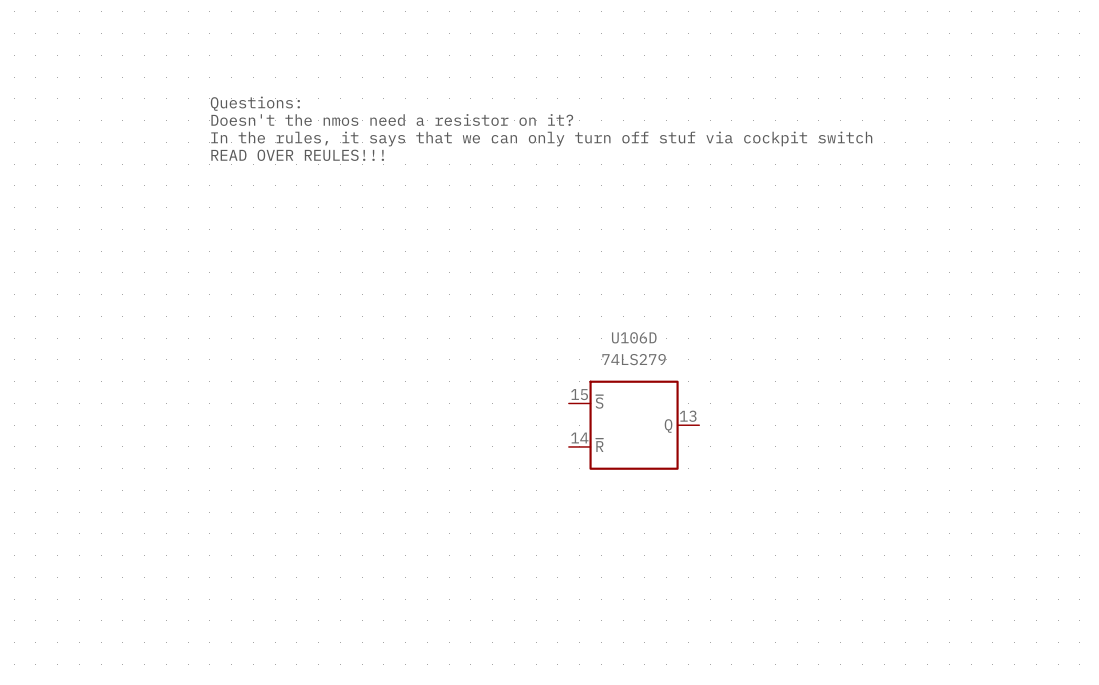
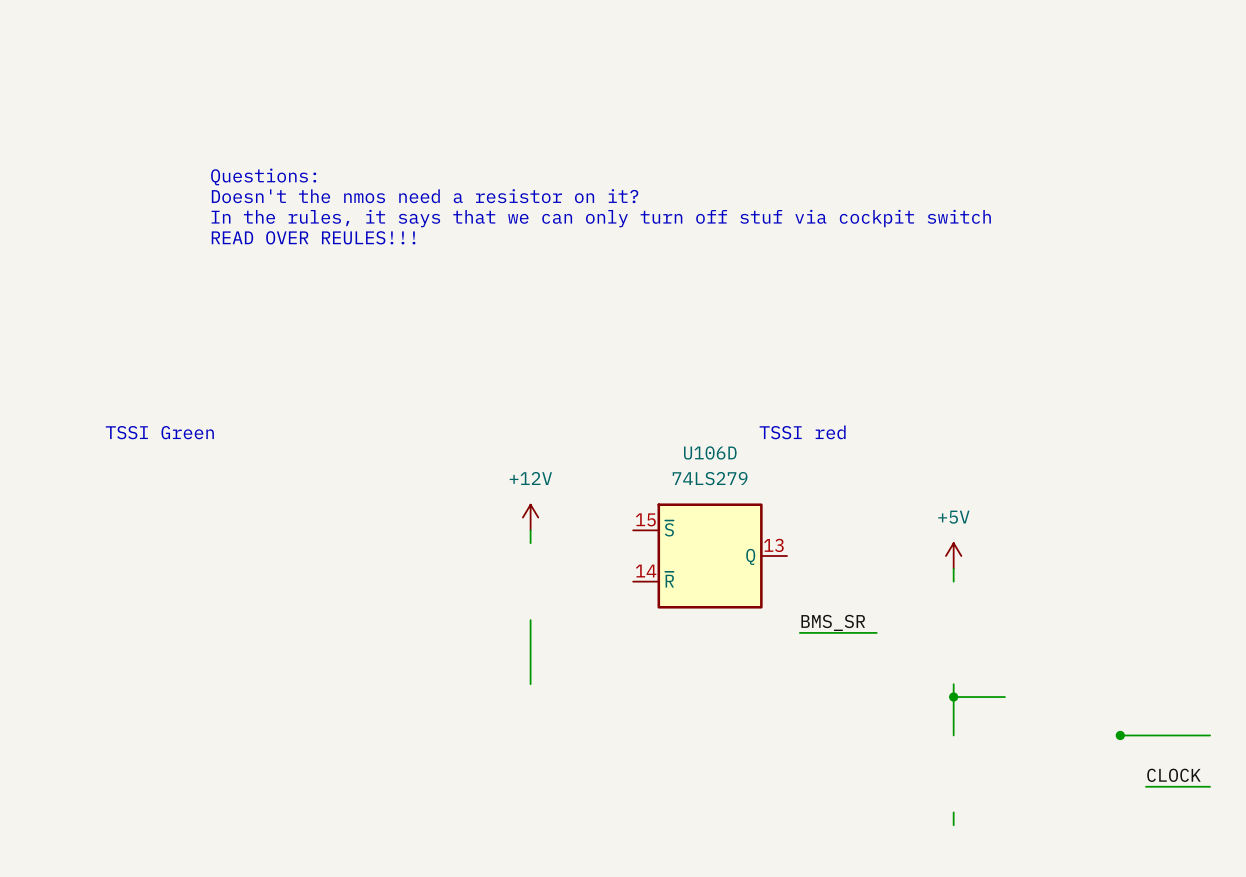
text: none -> TSSI Green (159, 432)
text: none -> TSSI red (802, 432)
power symbol: none -> +12V (530, 517)
wire: none -> (530, 530) (530, 543)
power symbol: none -> +5V (953, 555)
wire: none -> (953, 568) (953, 581)
wire: none -> (530, 620) (530, 684)
label: none -> BMS_SR (833, 622)
wire: none -> (799, 632) (876, 632)
wire: none -> (953, 684) (953, 735)
wire: none -> (953, 697) (1004, 697)
junction: none -> (953, 697)
wire: none -> (1120, 735) (1210, 735)
junction: none -> (1120, 735)
label: none -> CLOCK (1173, 775)
wire: none -> (1145, 786) (1210, 786)
wire: none -> (953, 812) (953, 825)

